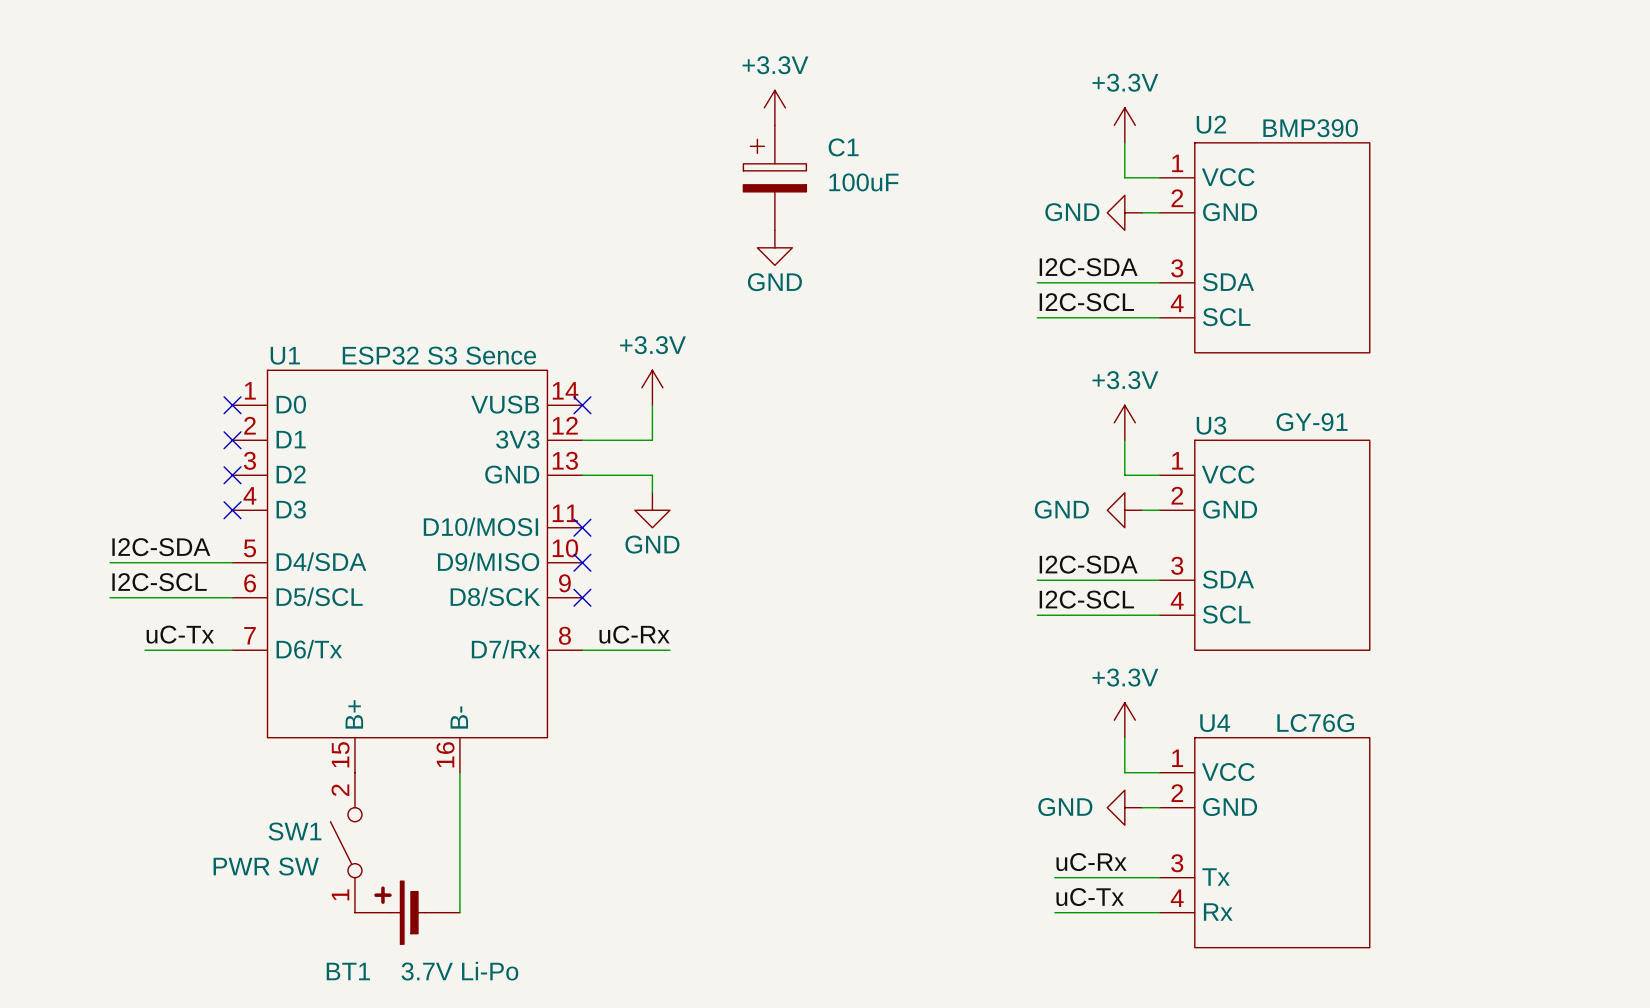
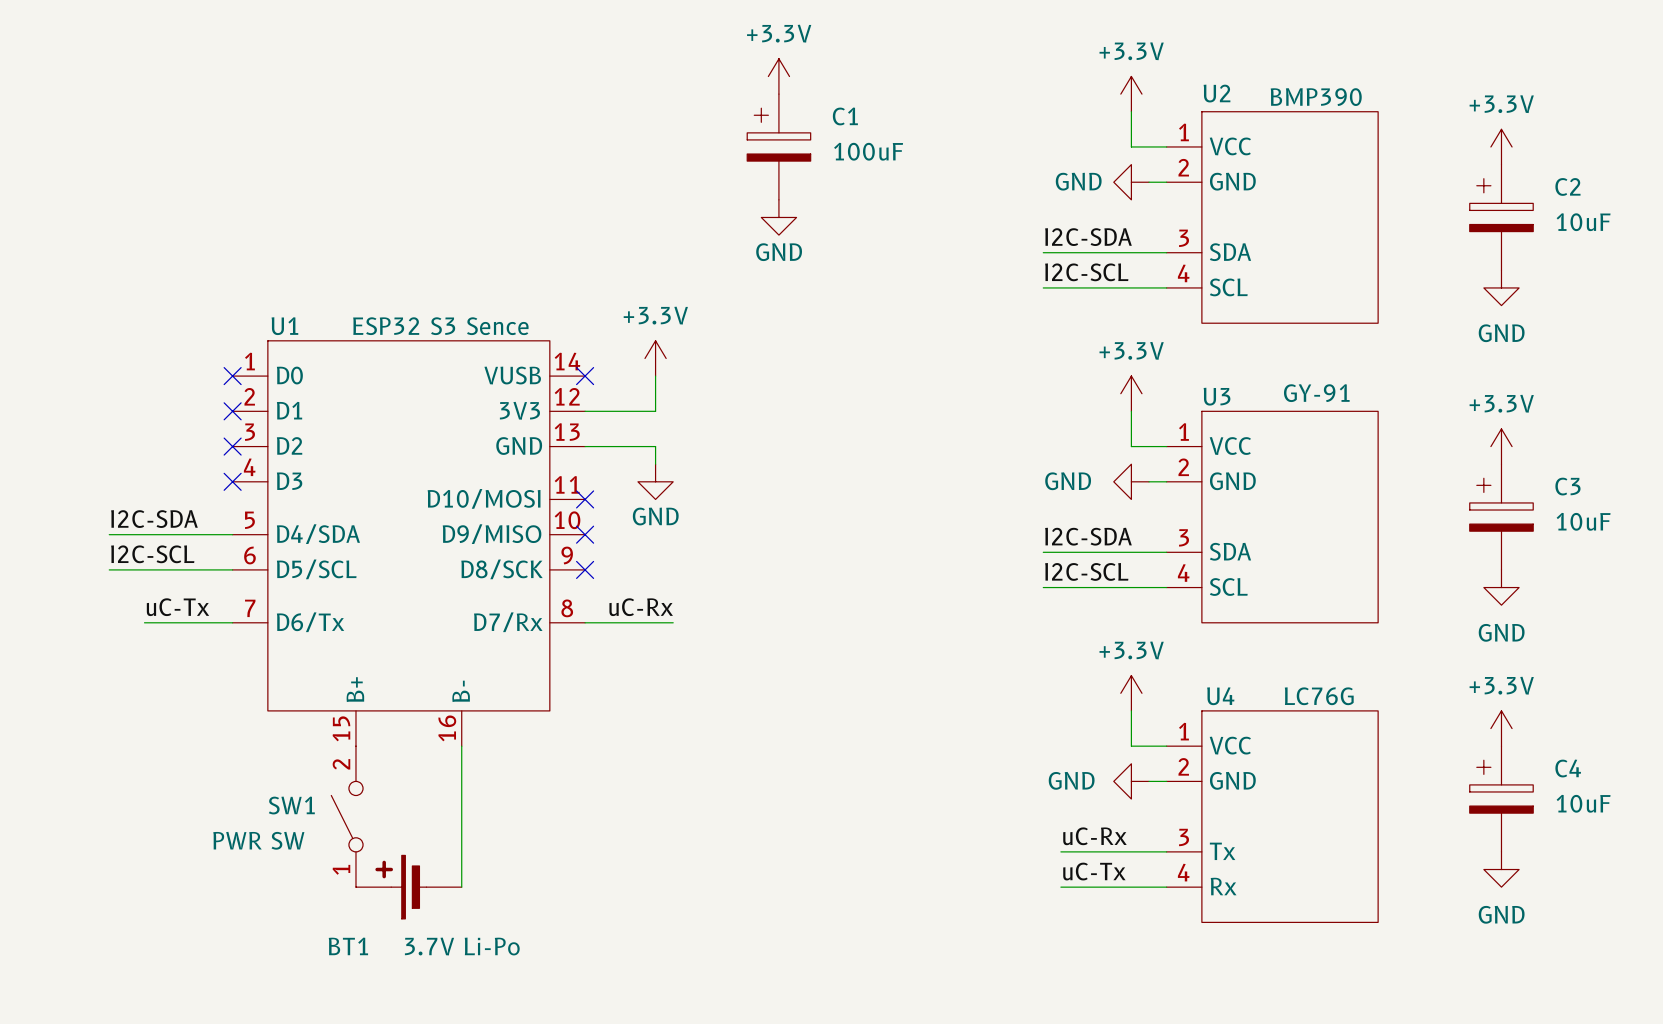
power symbol: none -> +3.3V (1501, 146)
C2: none -> 10uF (1501, 217)
power symbol: none -> GND (1501, 287)
power symbol: none -> +3.3V (1501, 446)
C3: none -> 10uF (1501, 517)
power symbol: none -> GND (1501, 587)
power symbol: none -> +3.3V (1501, 728)
C4: none -> 10uF (1501, 799)
power symbol: none -> GND (1501, 869)

